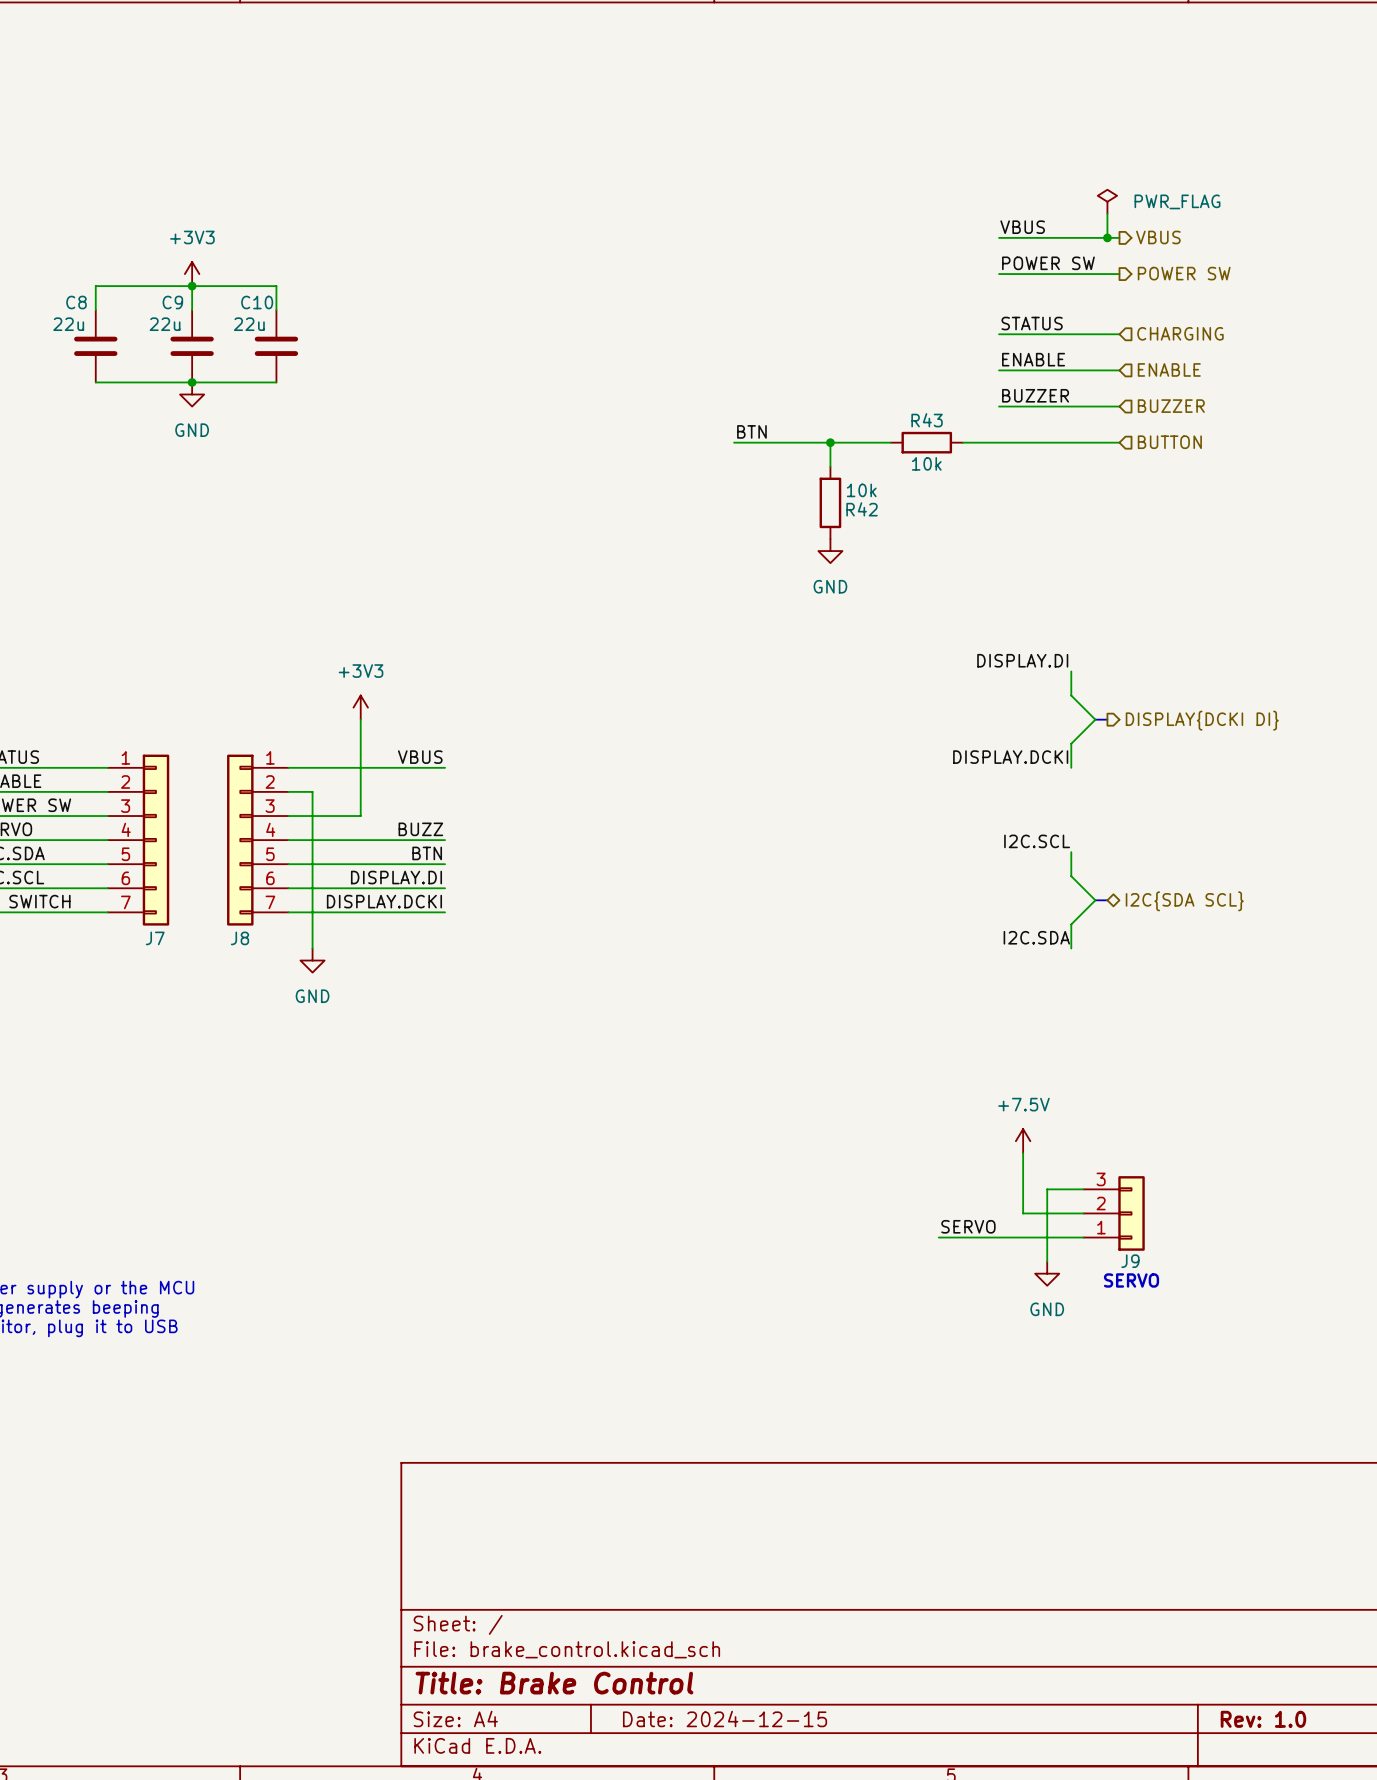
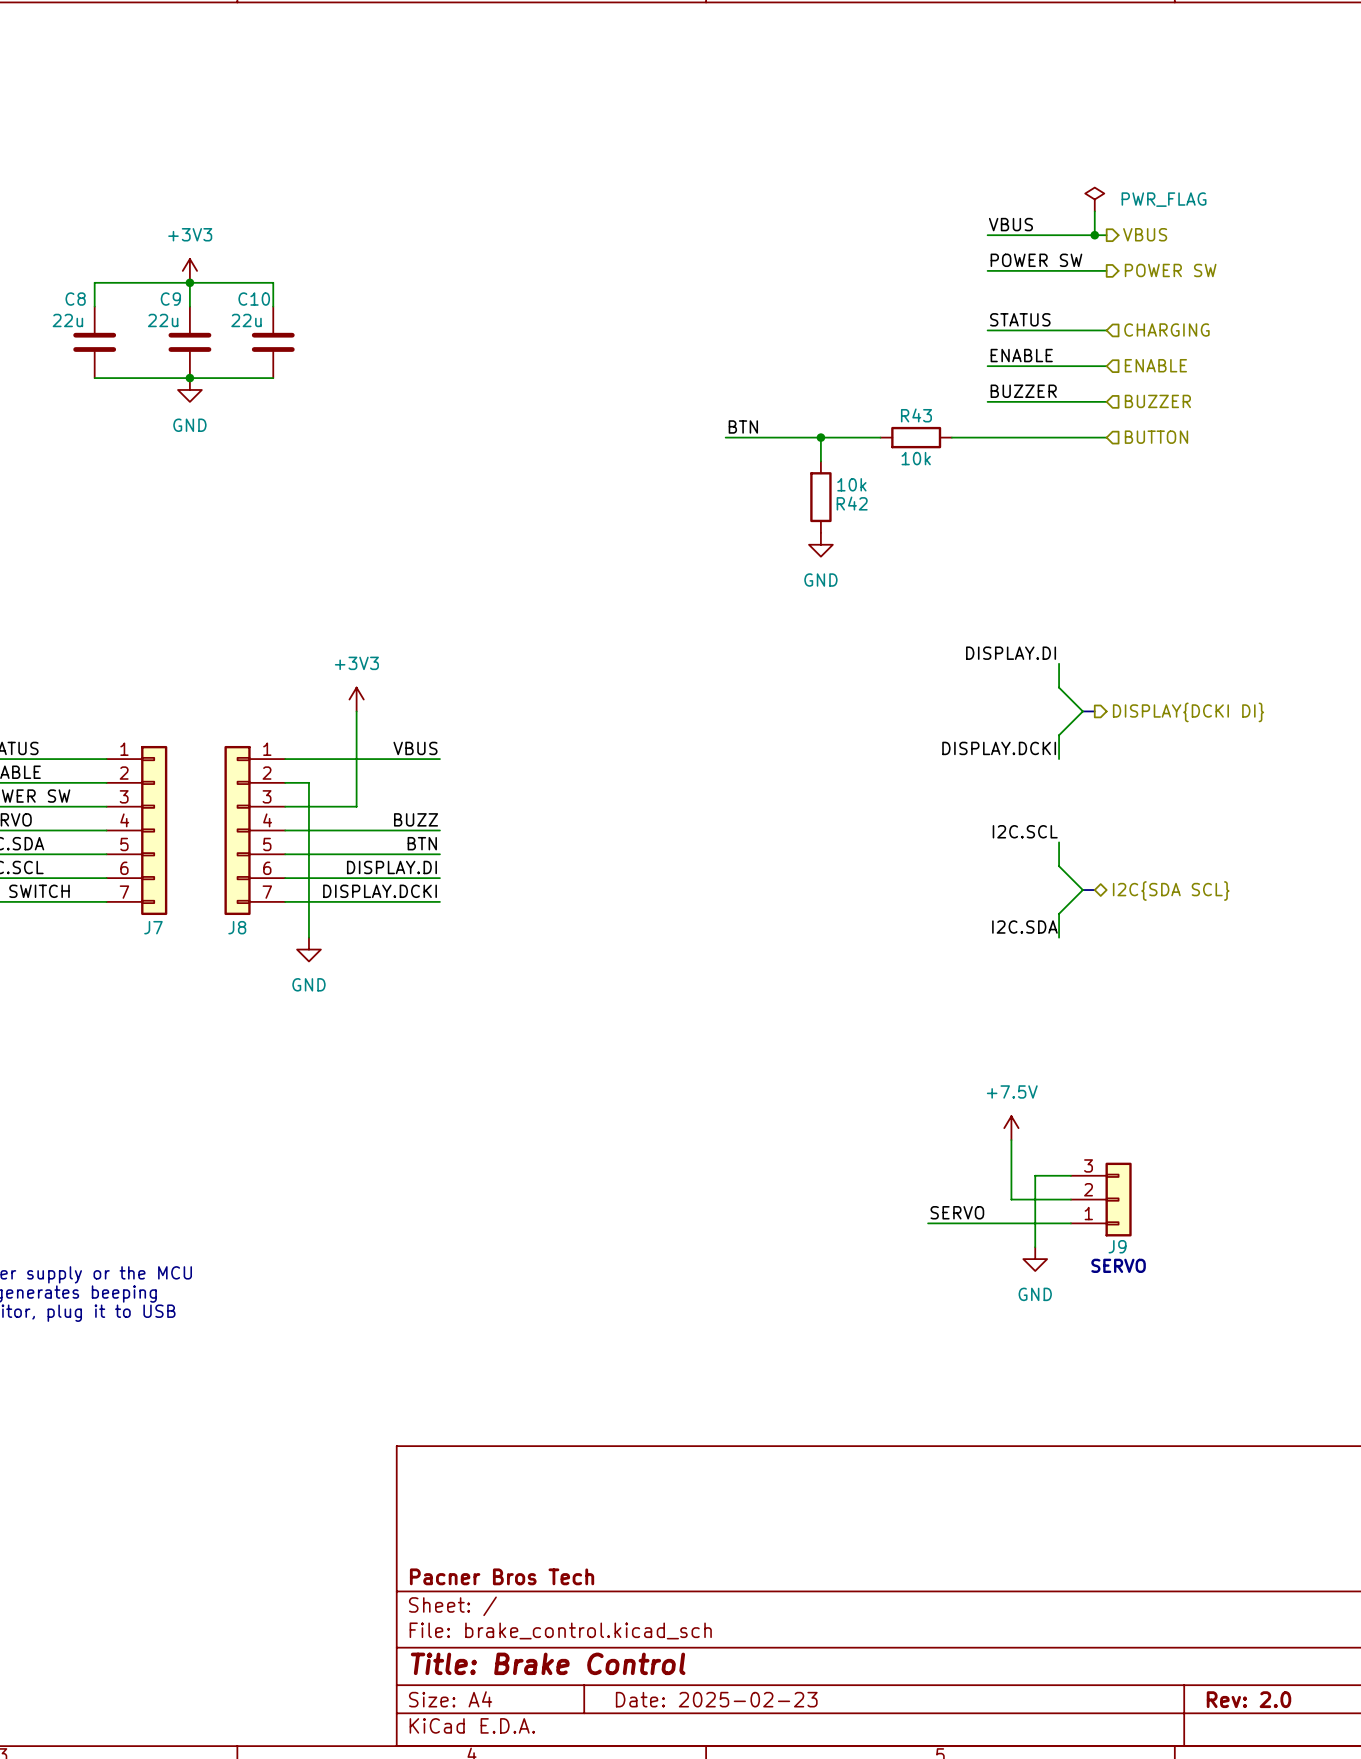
title block: none -> Pacner Bros Tech (502, 1576)
title block: Date: 2024-12-15 (725, 1718) -> Date: 2025-02-23 (716, 1699)
title block: Rev: 1.0 (1263, 1719) -> Rev: 2.0 (1248, 1699)

